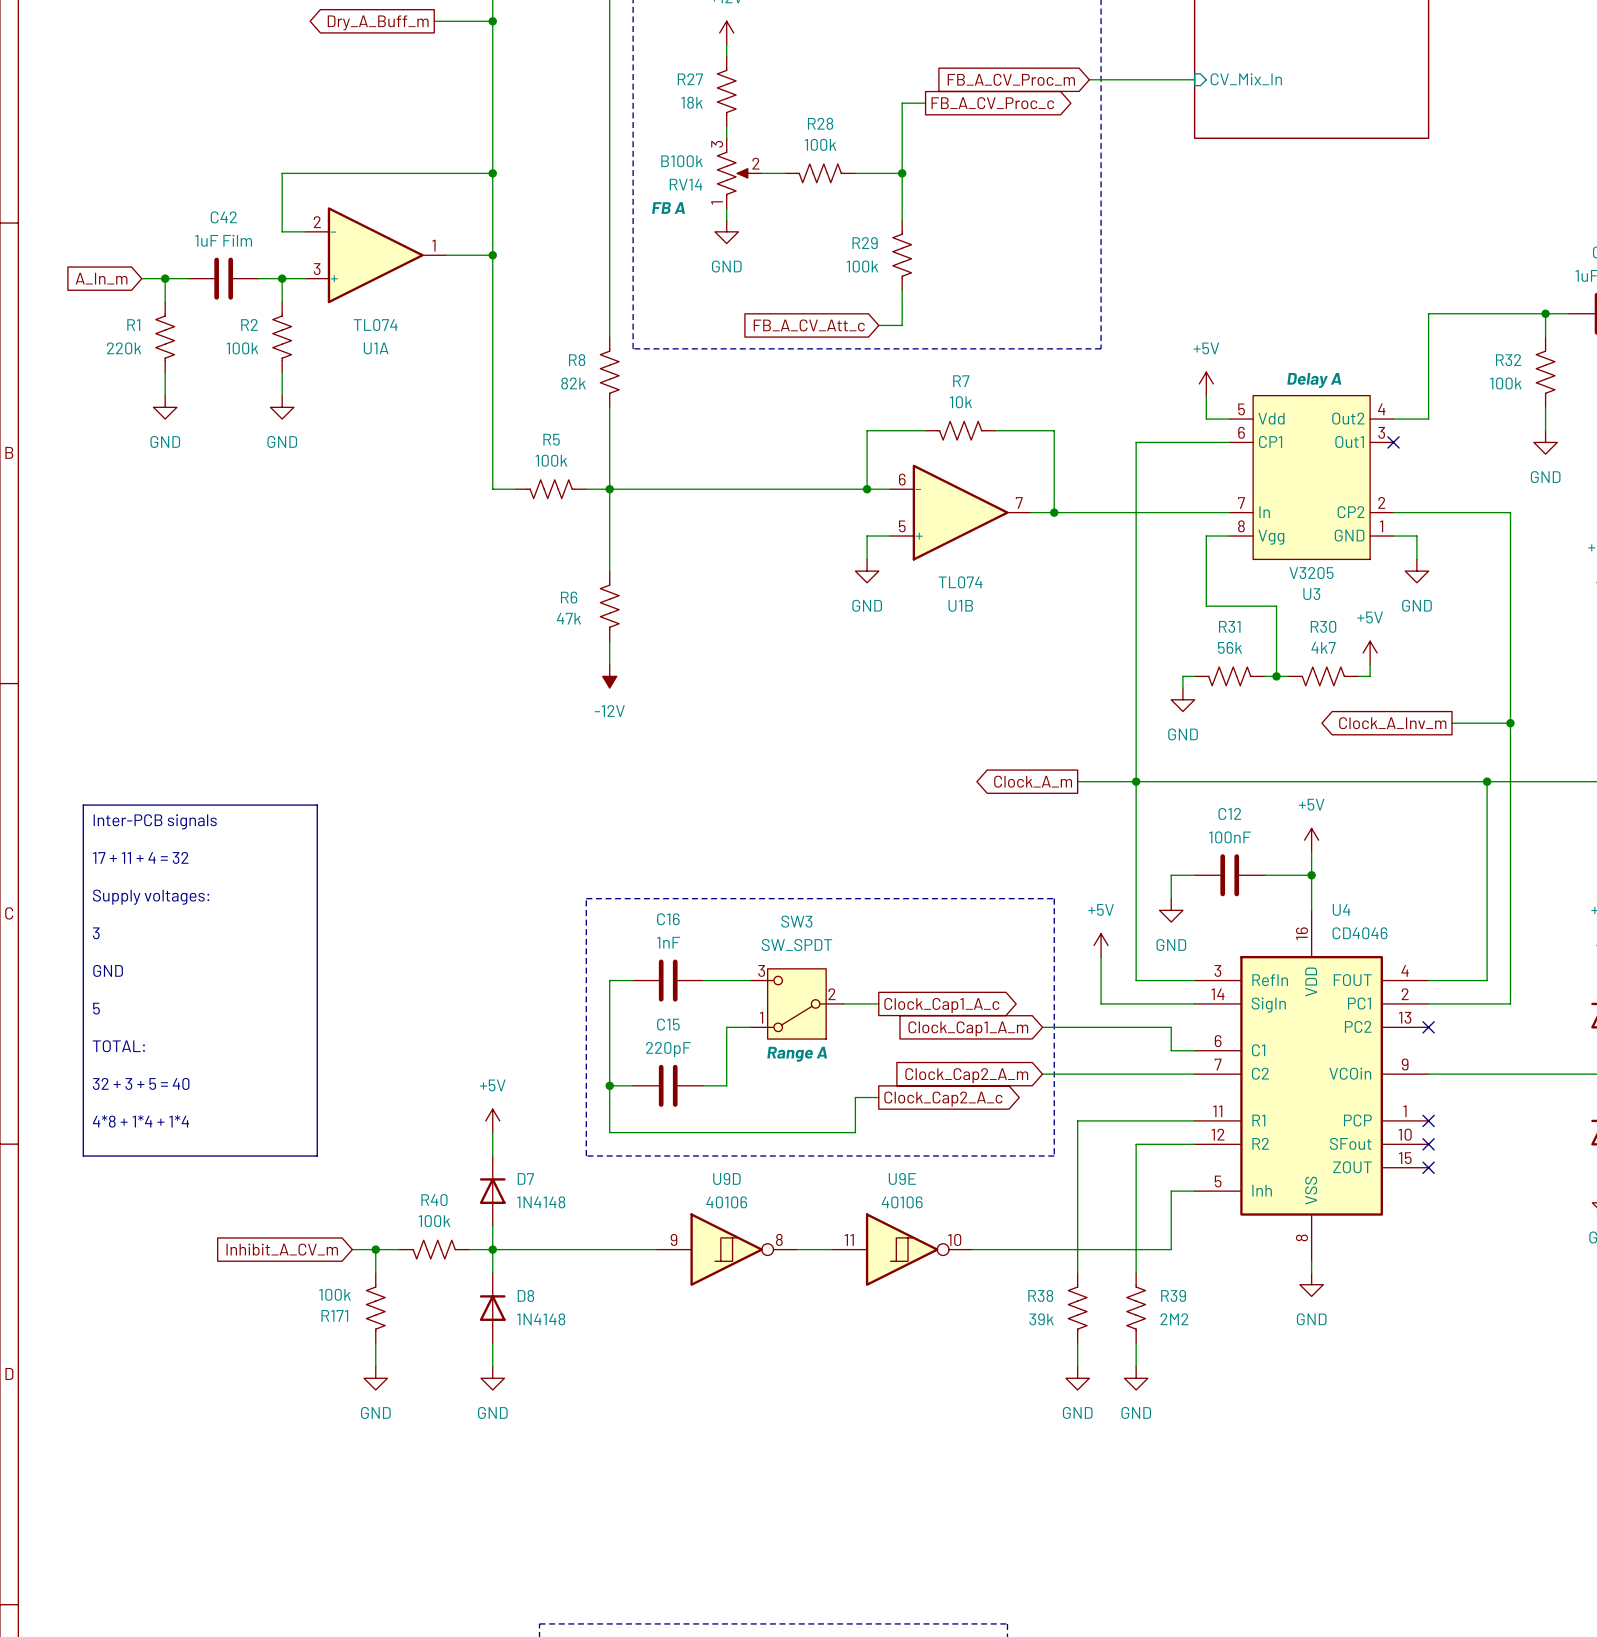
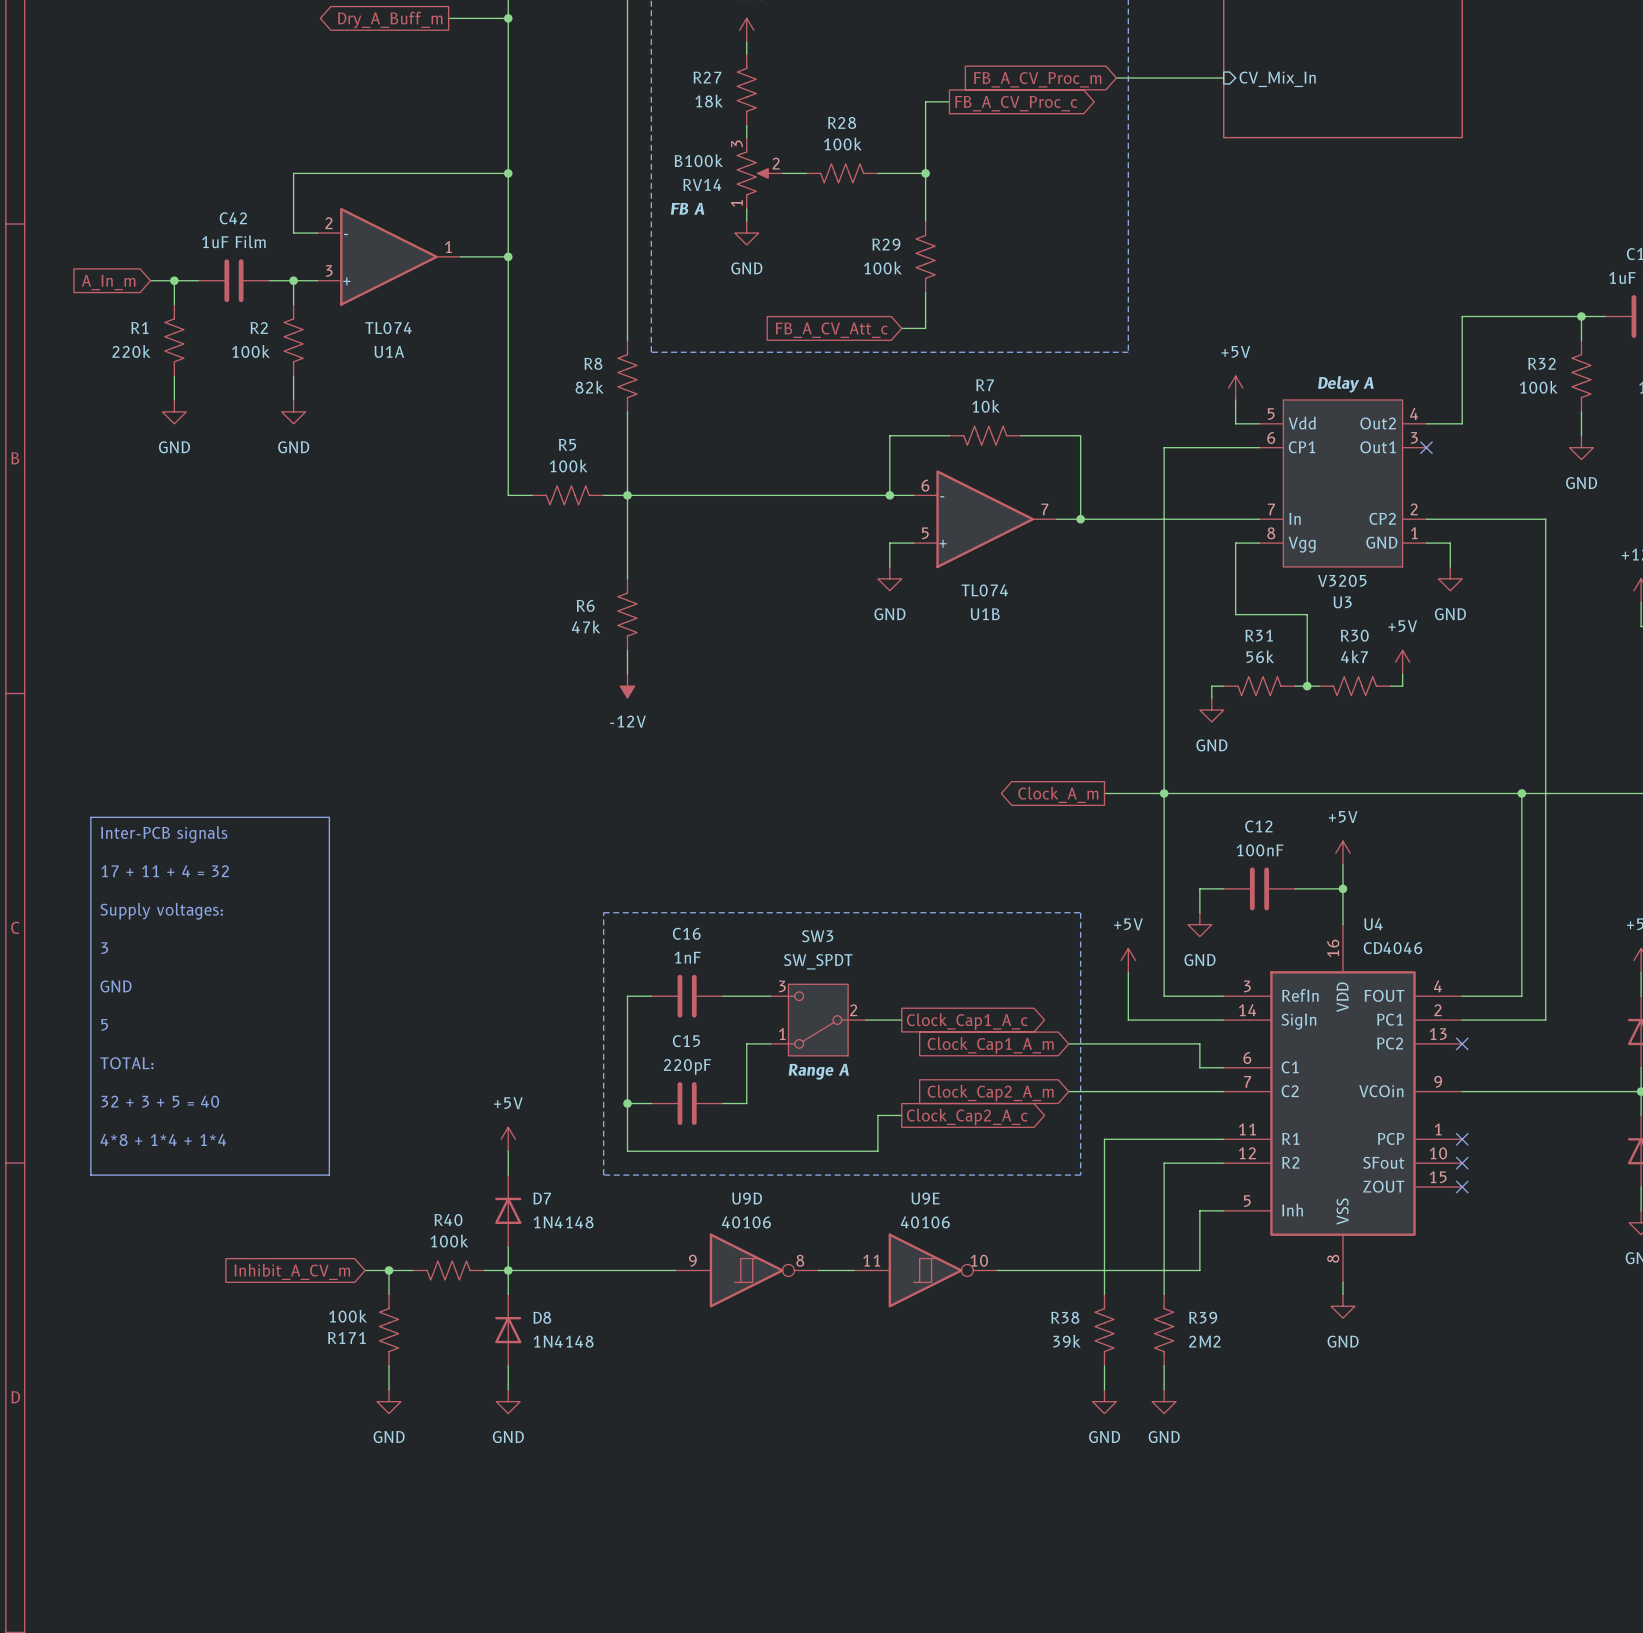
global label: Clock_A_Inv_m (1392, 723) -> none
wire: (1451, 723) (1510, 723) -> none
junction: (1510, 723) -> none

